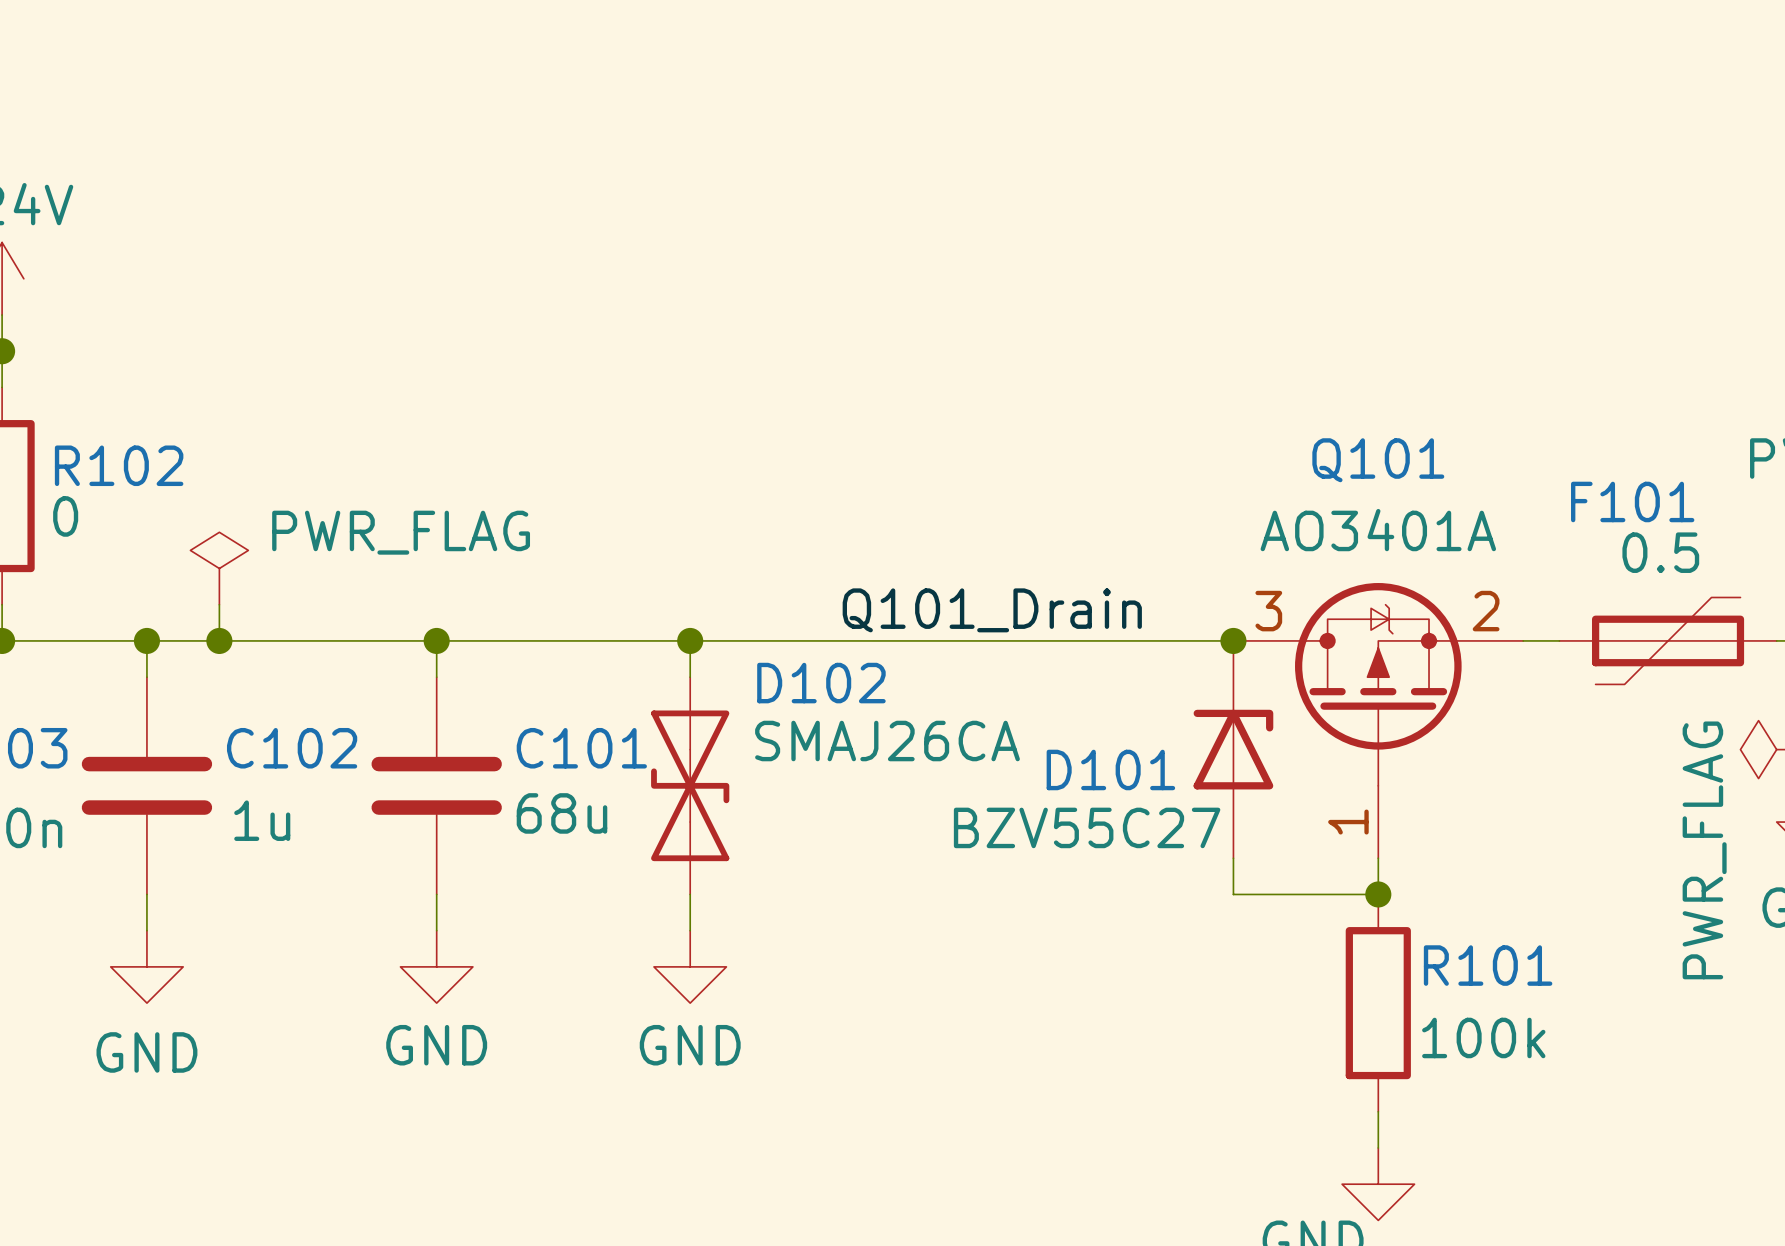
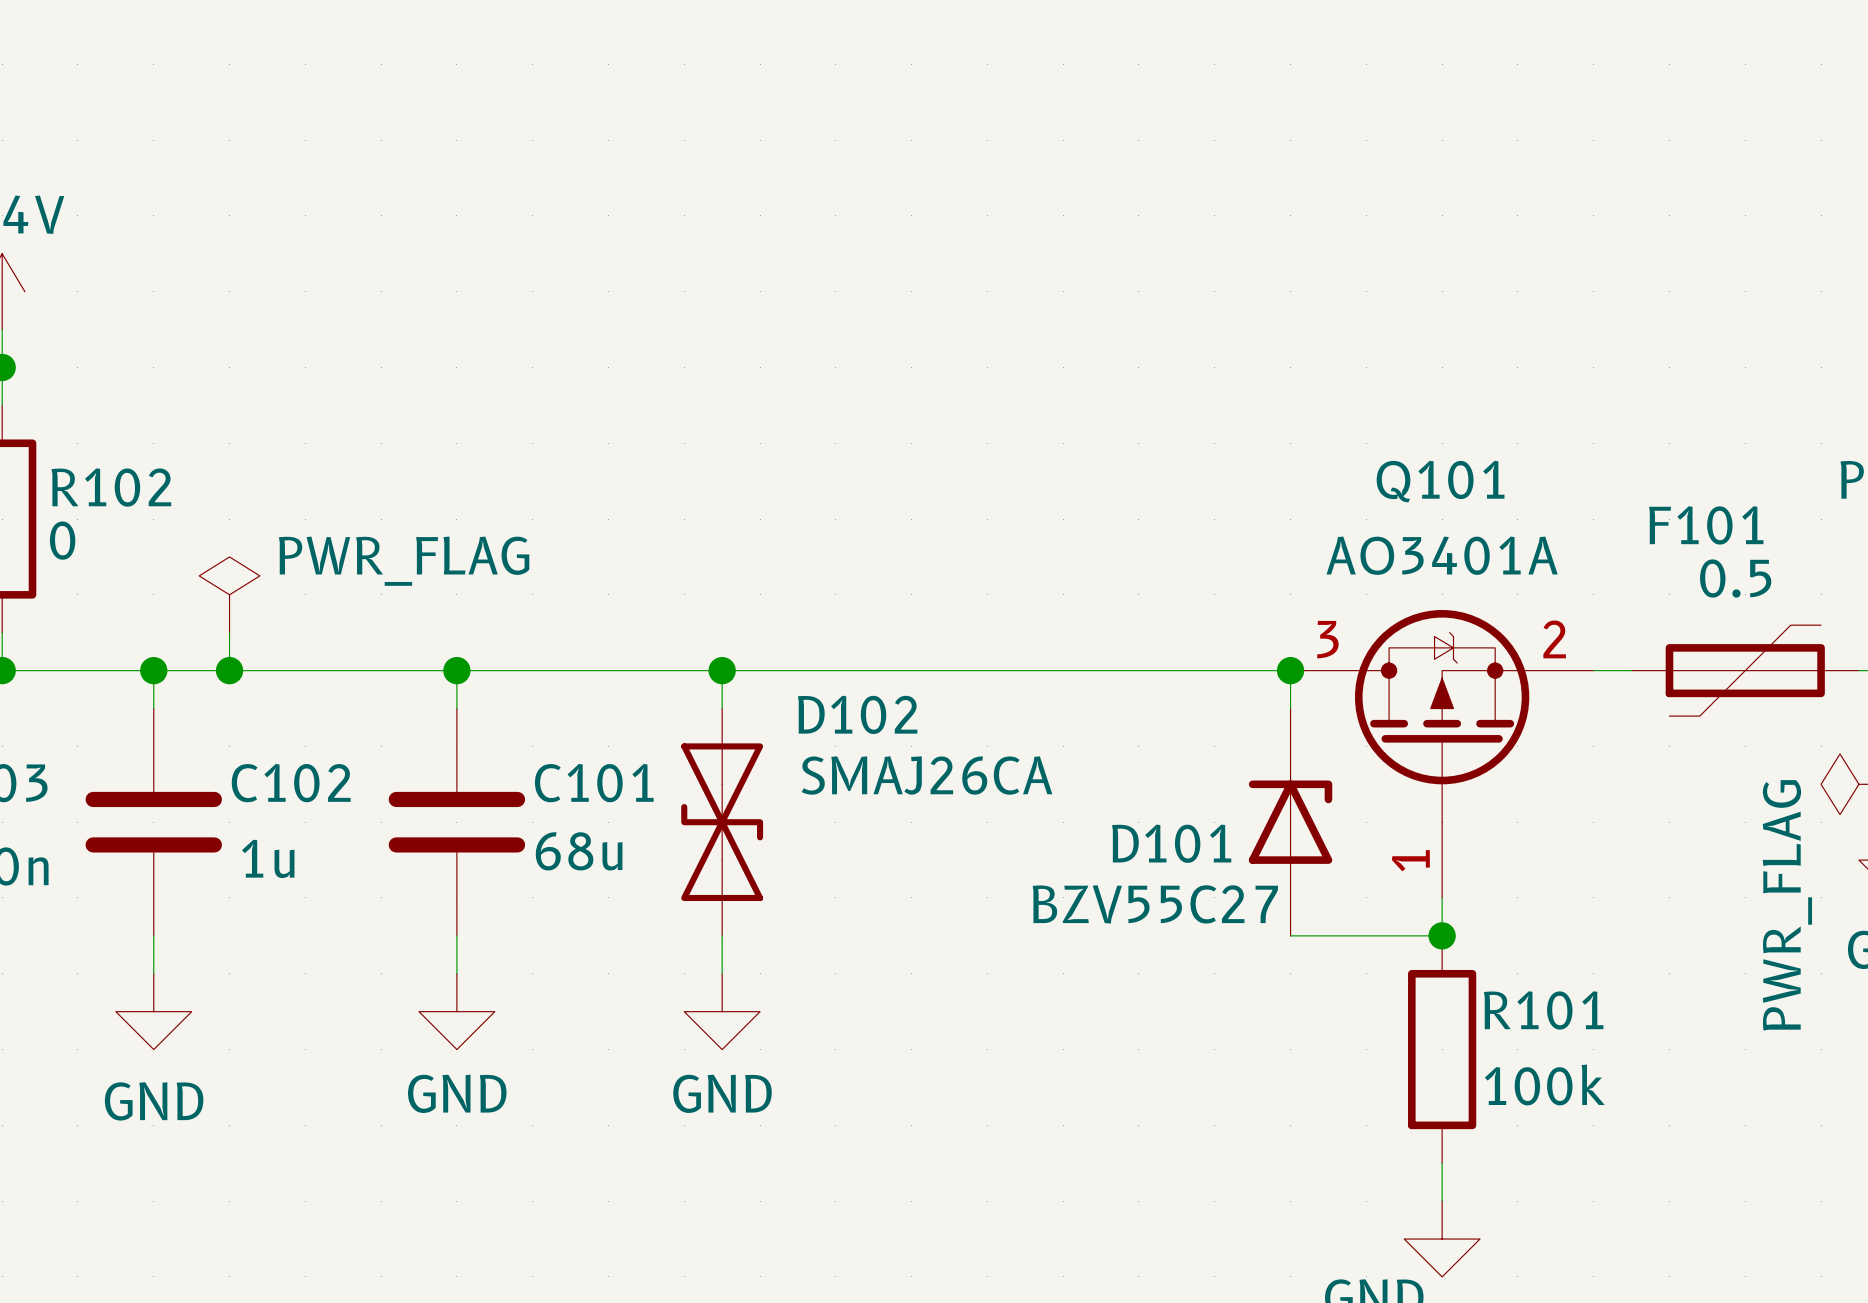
label: Q101_Drain (992, 610) -> none
D101 position: (1233, 749) -> (1290, 822)

